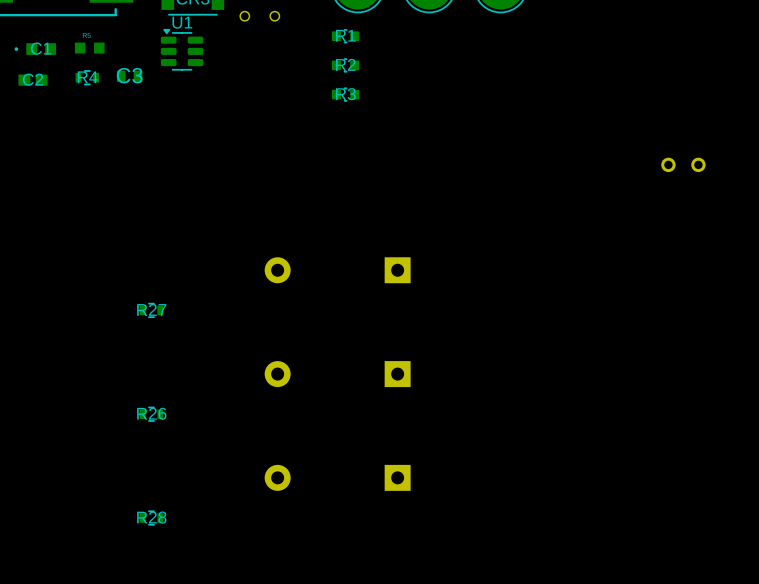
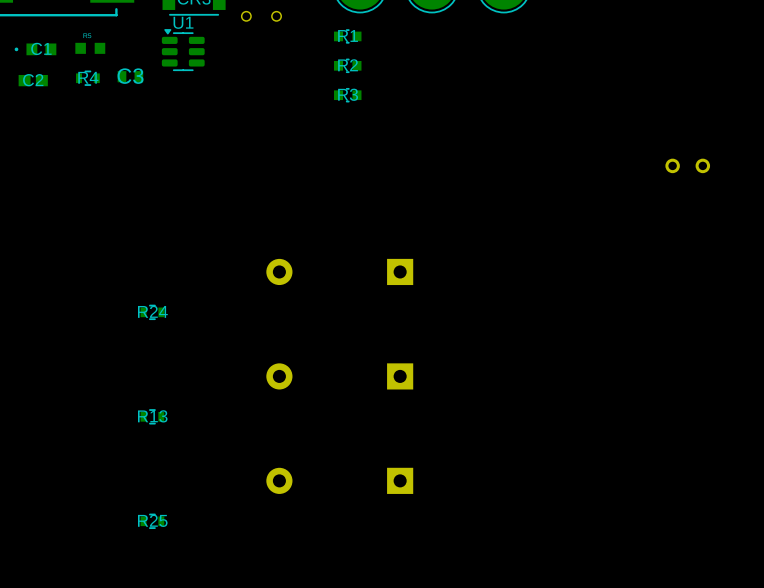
R27 name: R27 (151, 309) -> R24 (152, 311)
R26 name: R26 (151, 413) -> R13 (152, 416)
R28 name: R28 (151, 517) -> R25 (152, 520)

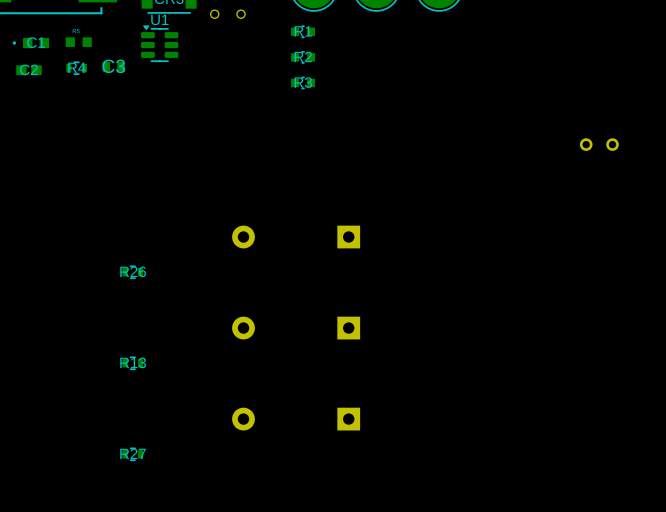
R24 name: R24 (152, 311) -> R26 (133, 271)
R25 name: R25 (152, 520) -> R27 (133, 453)

